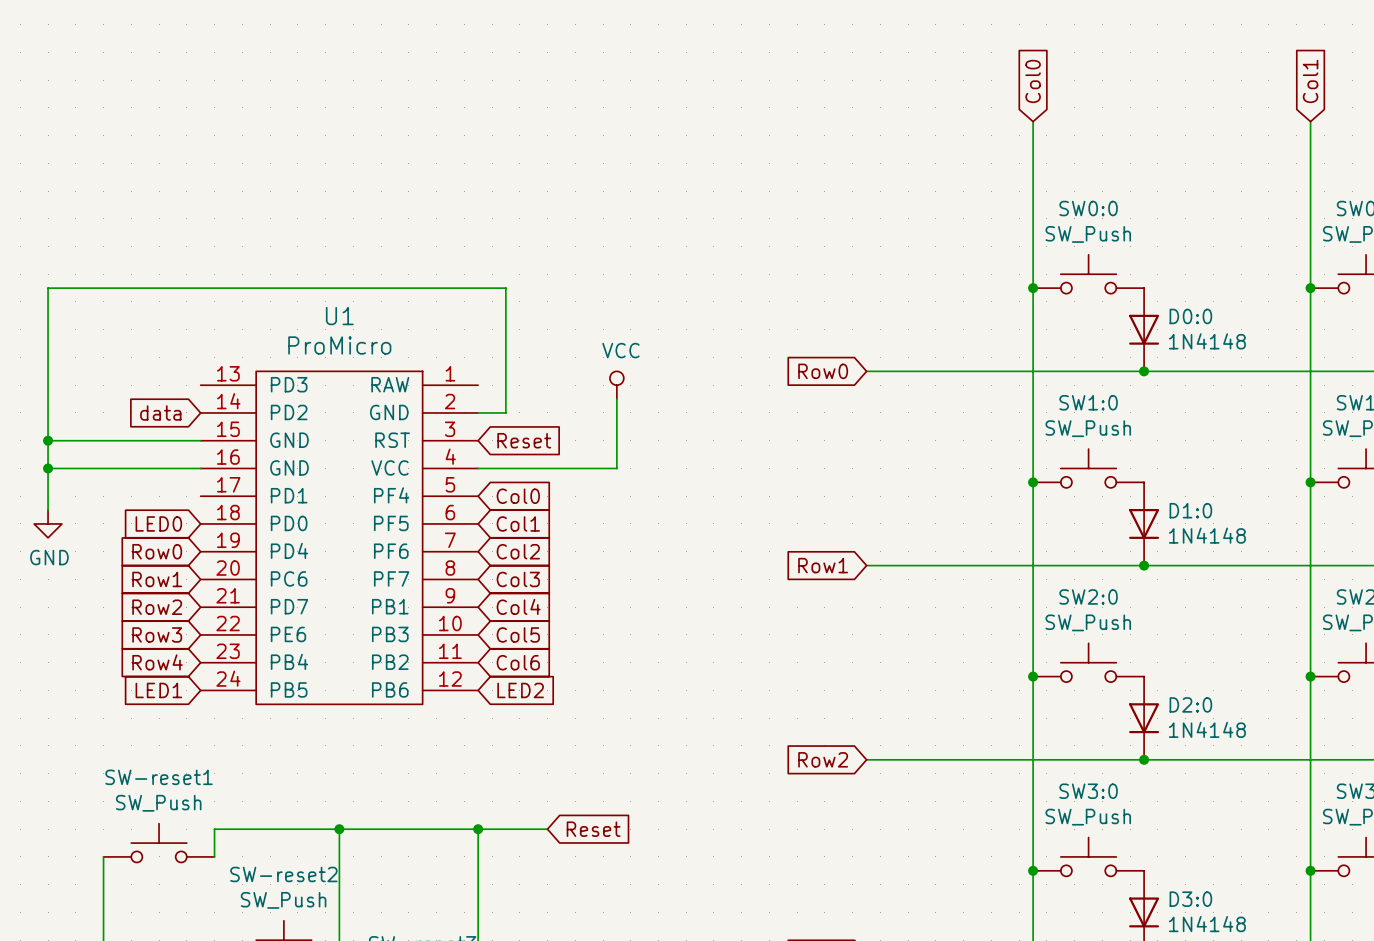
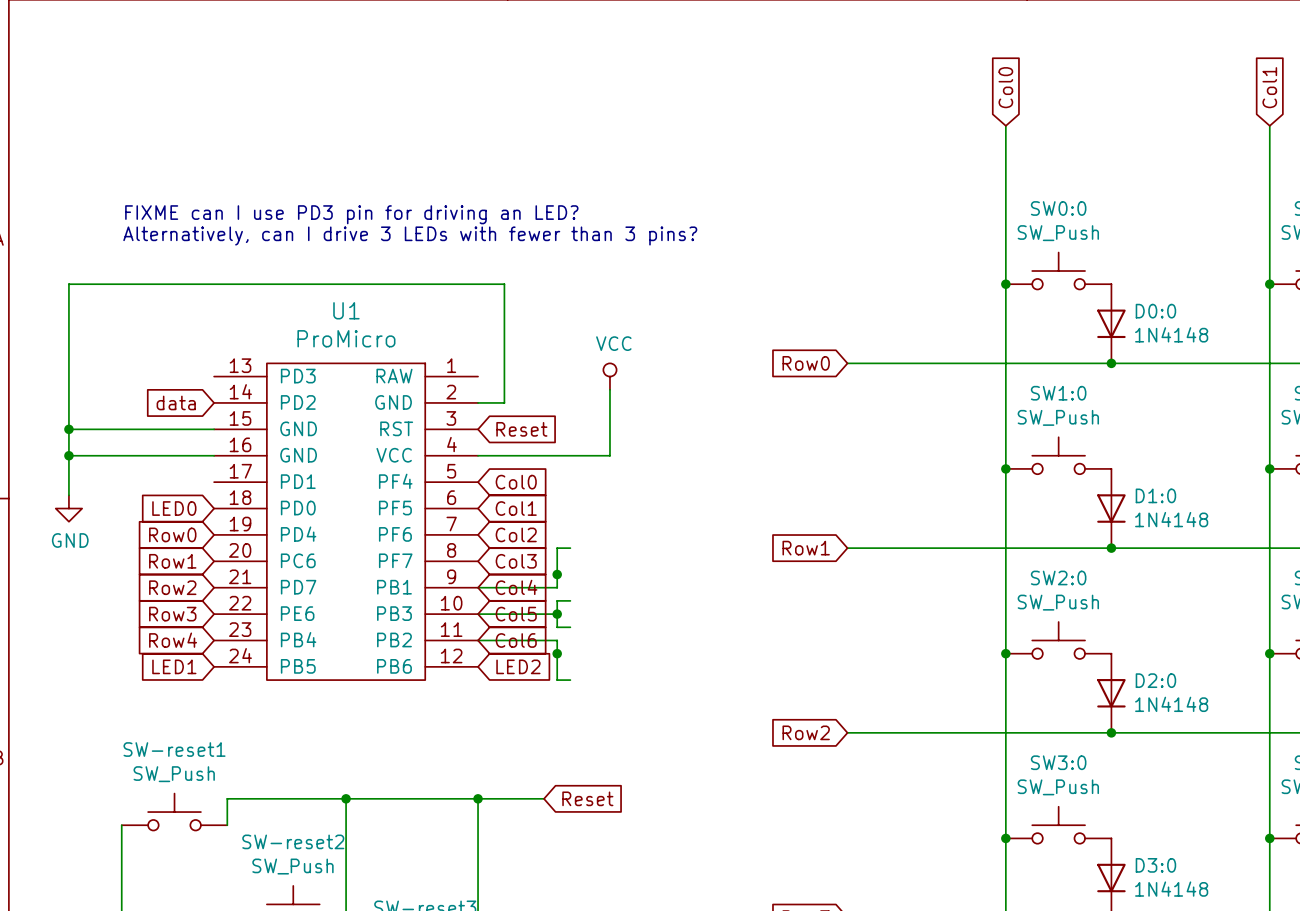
text: none -> FIXME can I use PD3 pin for driving an LED? (351, 214)
text: none -> Alternatively, can I drive 3 LEDs with fewer than 3 pins? (410, 236)
wire: none -> (570, 548) (557, 548) (557, 587) (478, 587)
junction: none -> (557, 574)
wire: none -> (570, 600) (557, 600) (557, 627) (570, 627)
wire: none -> (478, 614) (557, 614)
junction: none -> (557, 614)
wire: none -> (478, 640) (557, 640) (557, 680) (570, 680)
junction: none -> (557, 653)

